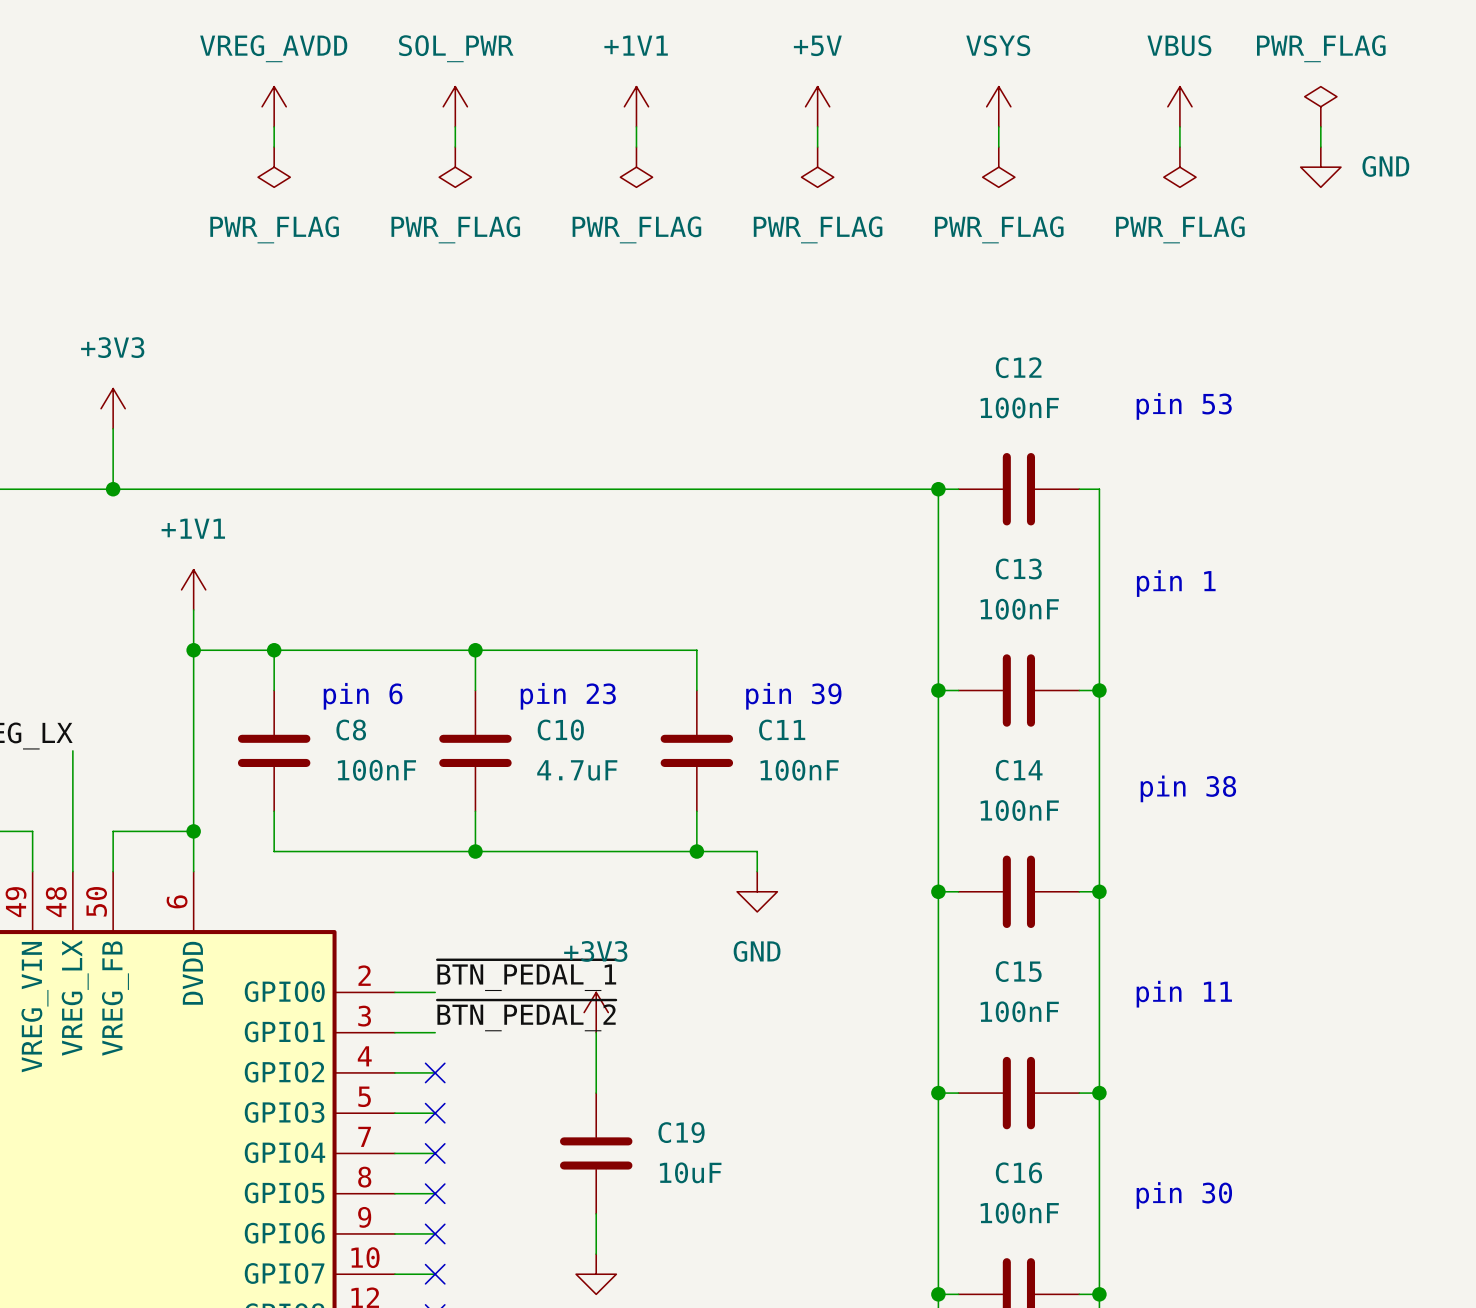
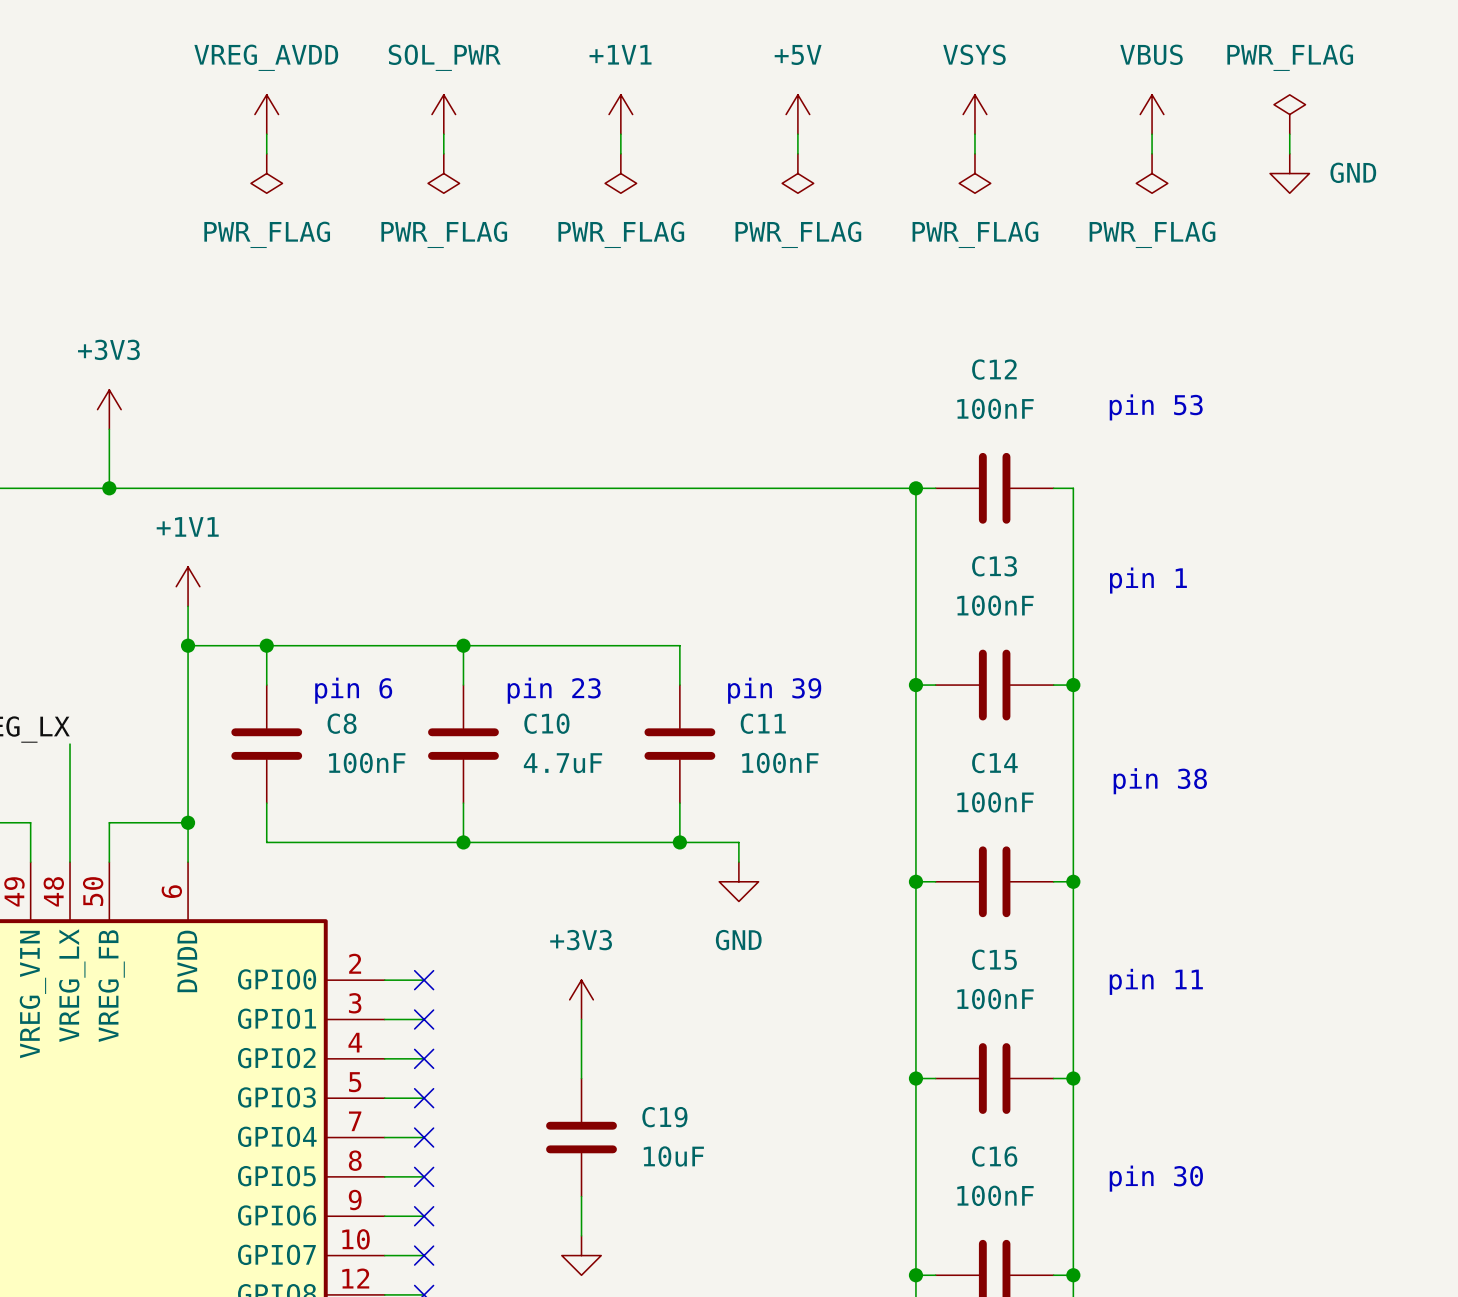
label: ~{BTN_PEDAL_1} (526, 975) -> none
no-connect mark: none -> (424, 980)
label: ~{BTN_PEDAL_2} (526, 1015) -> none
no-connect mark: none -> (424, 1019)

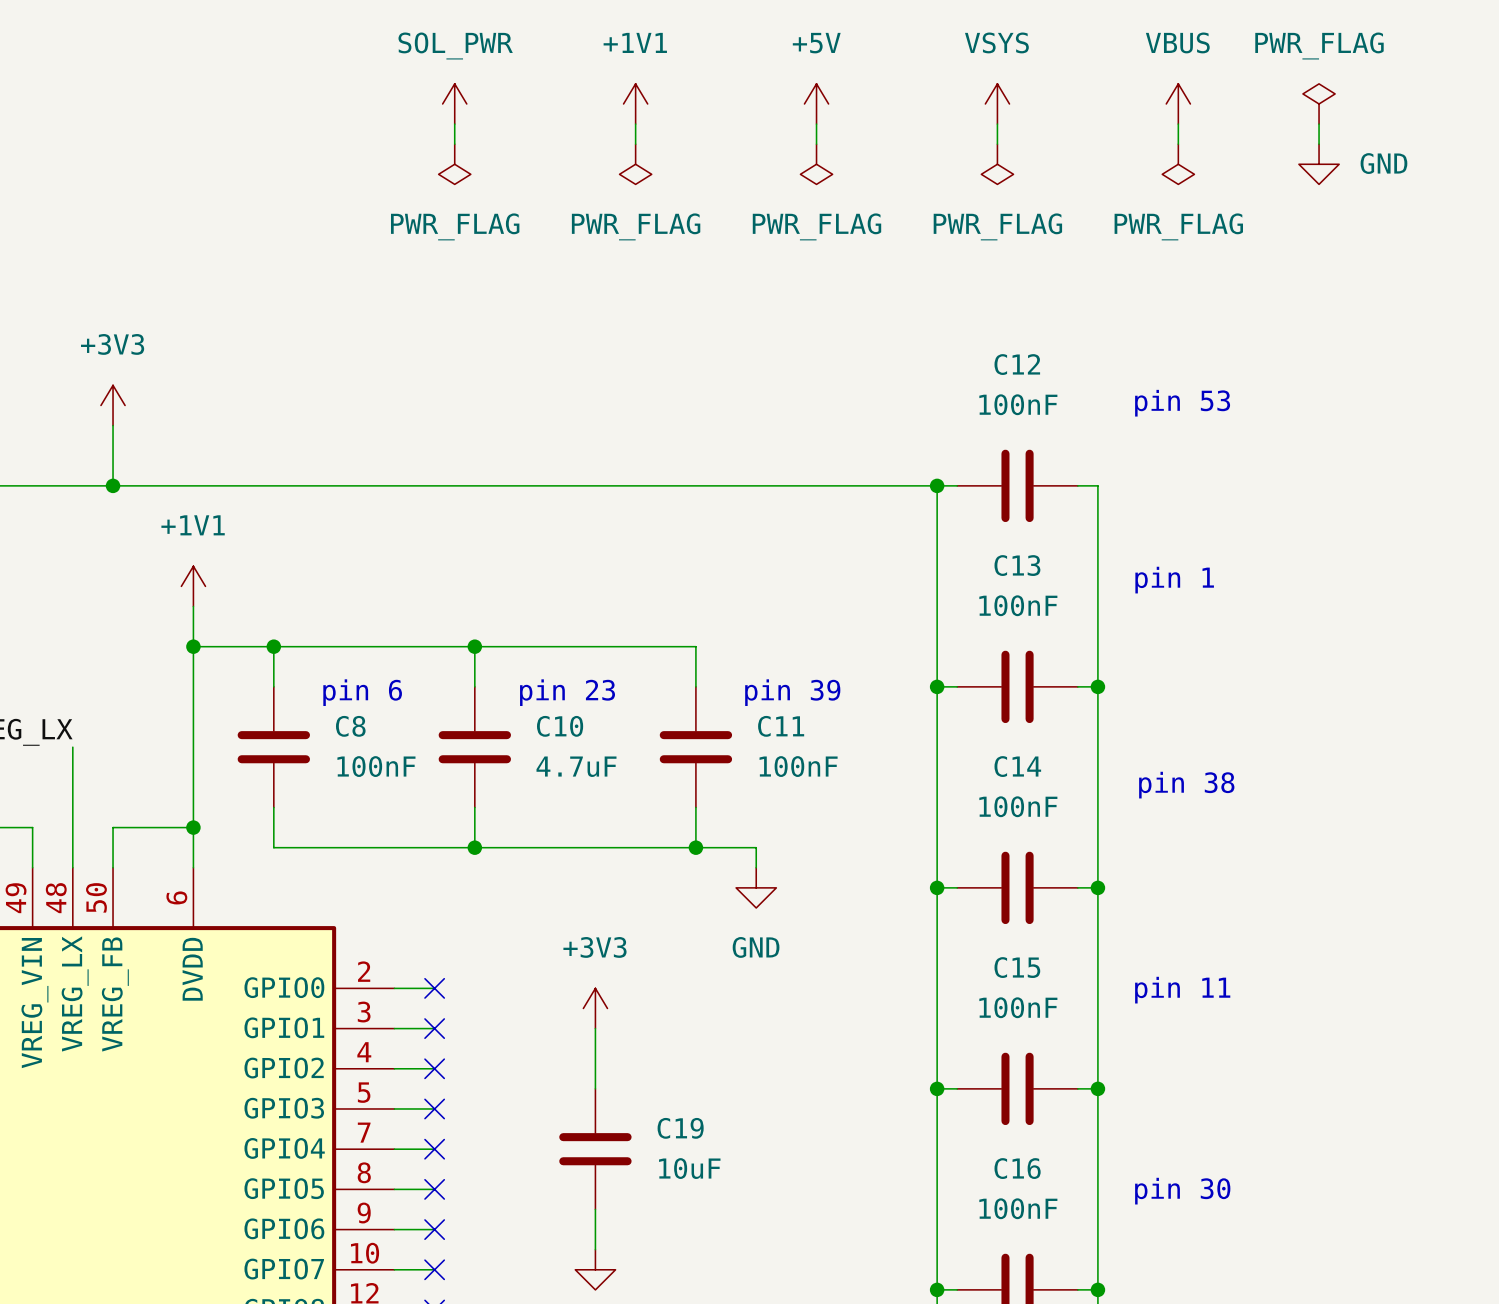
power symbol: VREG_AVDD (266, 114) -> none
wire: (266, 134) (266, 153) -> none
power symbol: PWR_FLAG (266, 173) -> none

